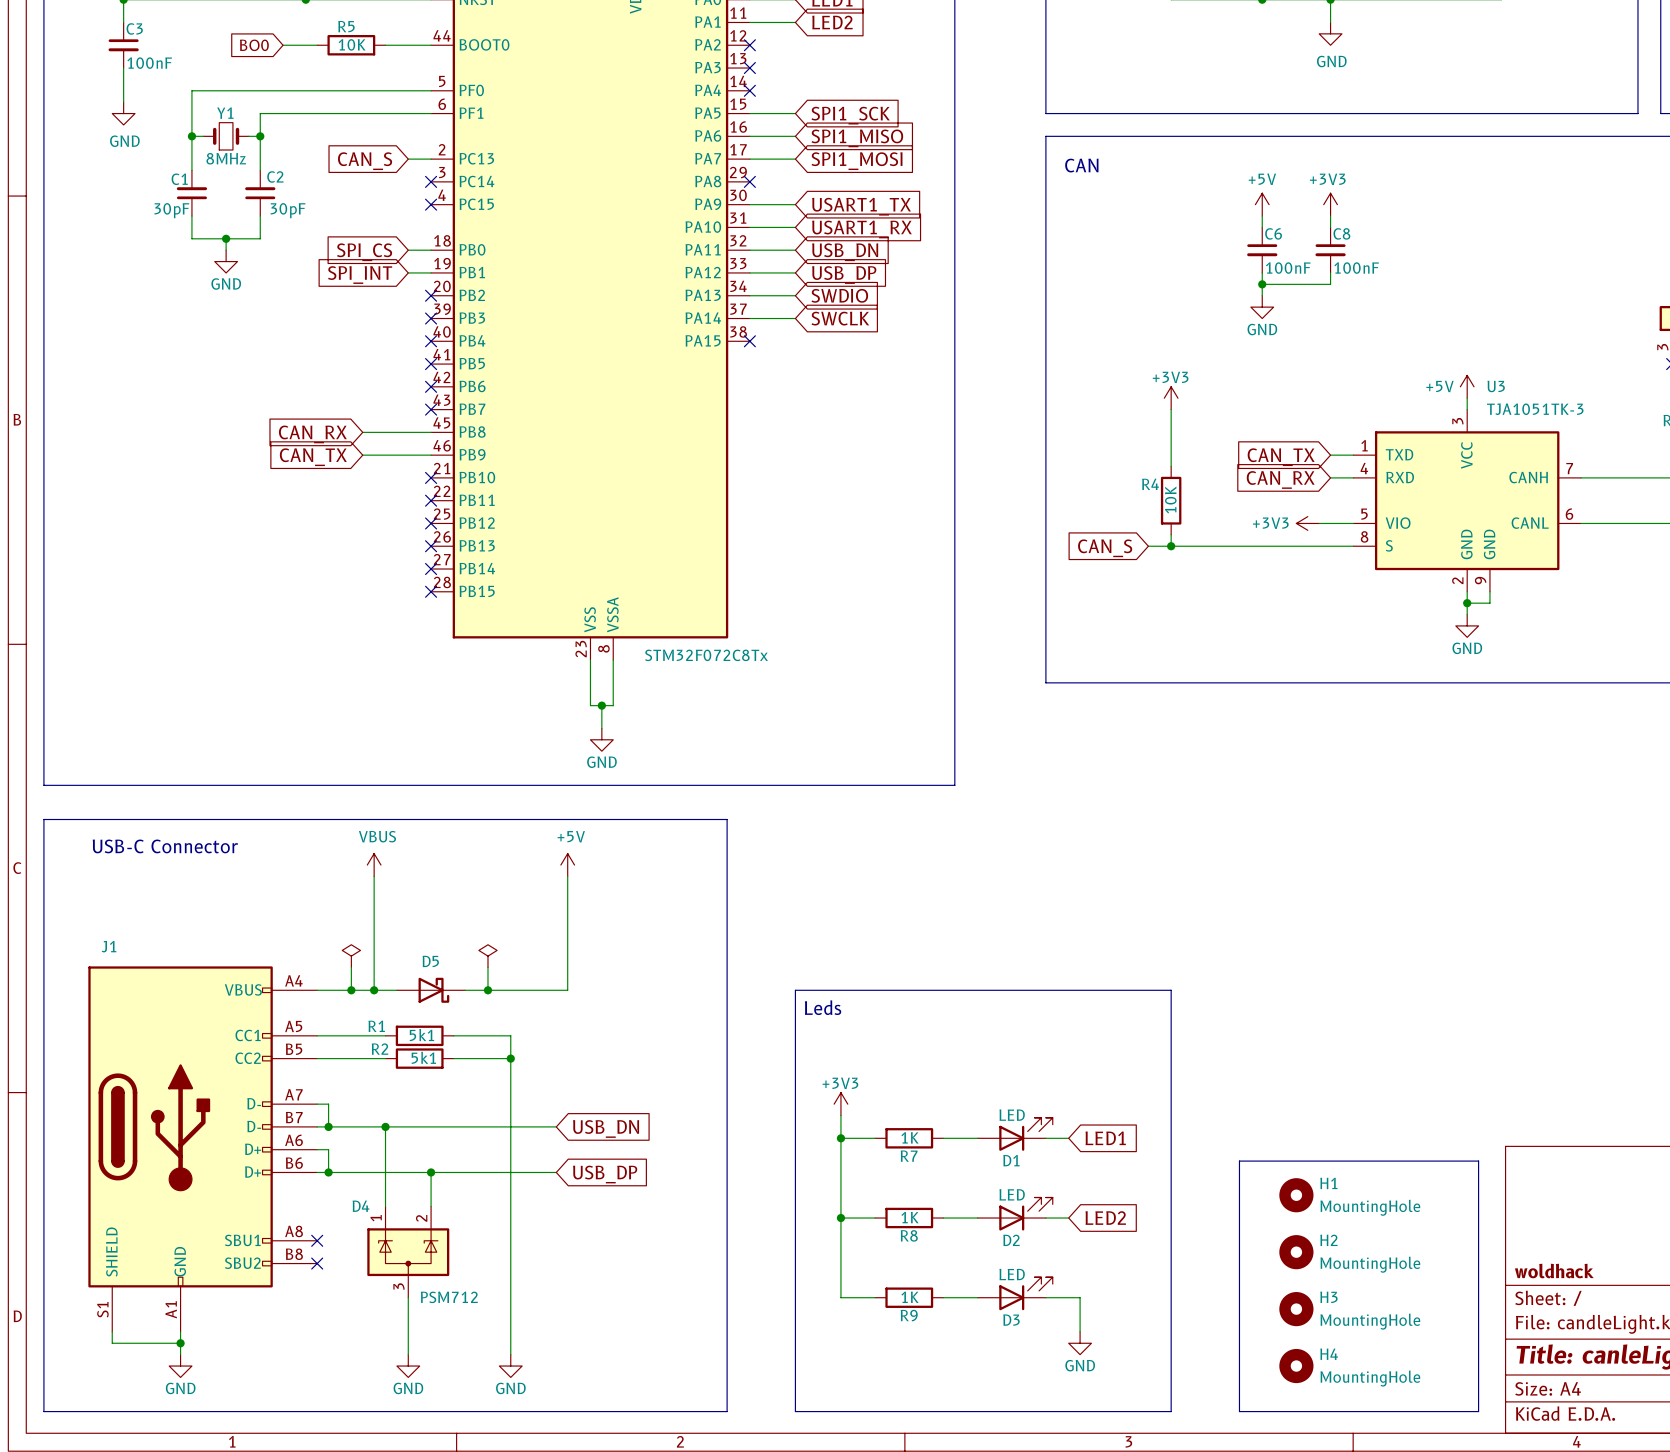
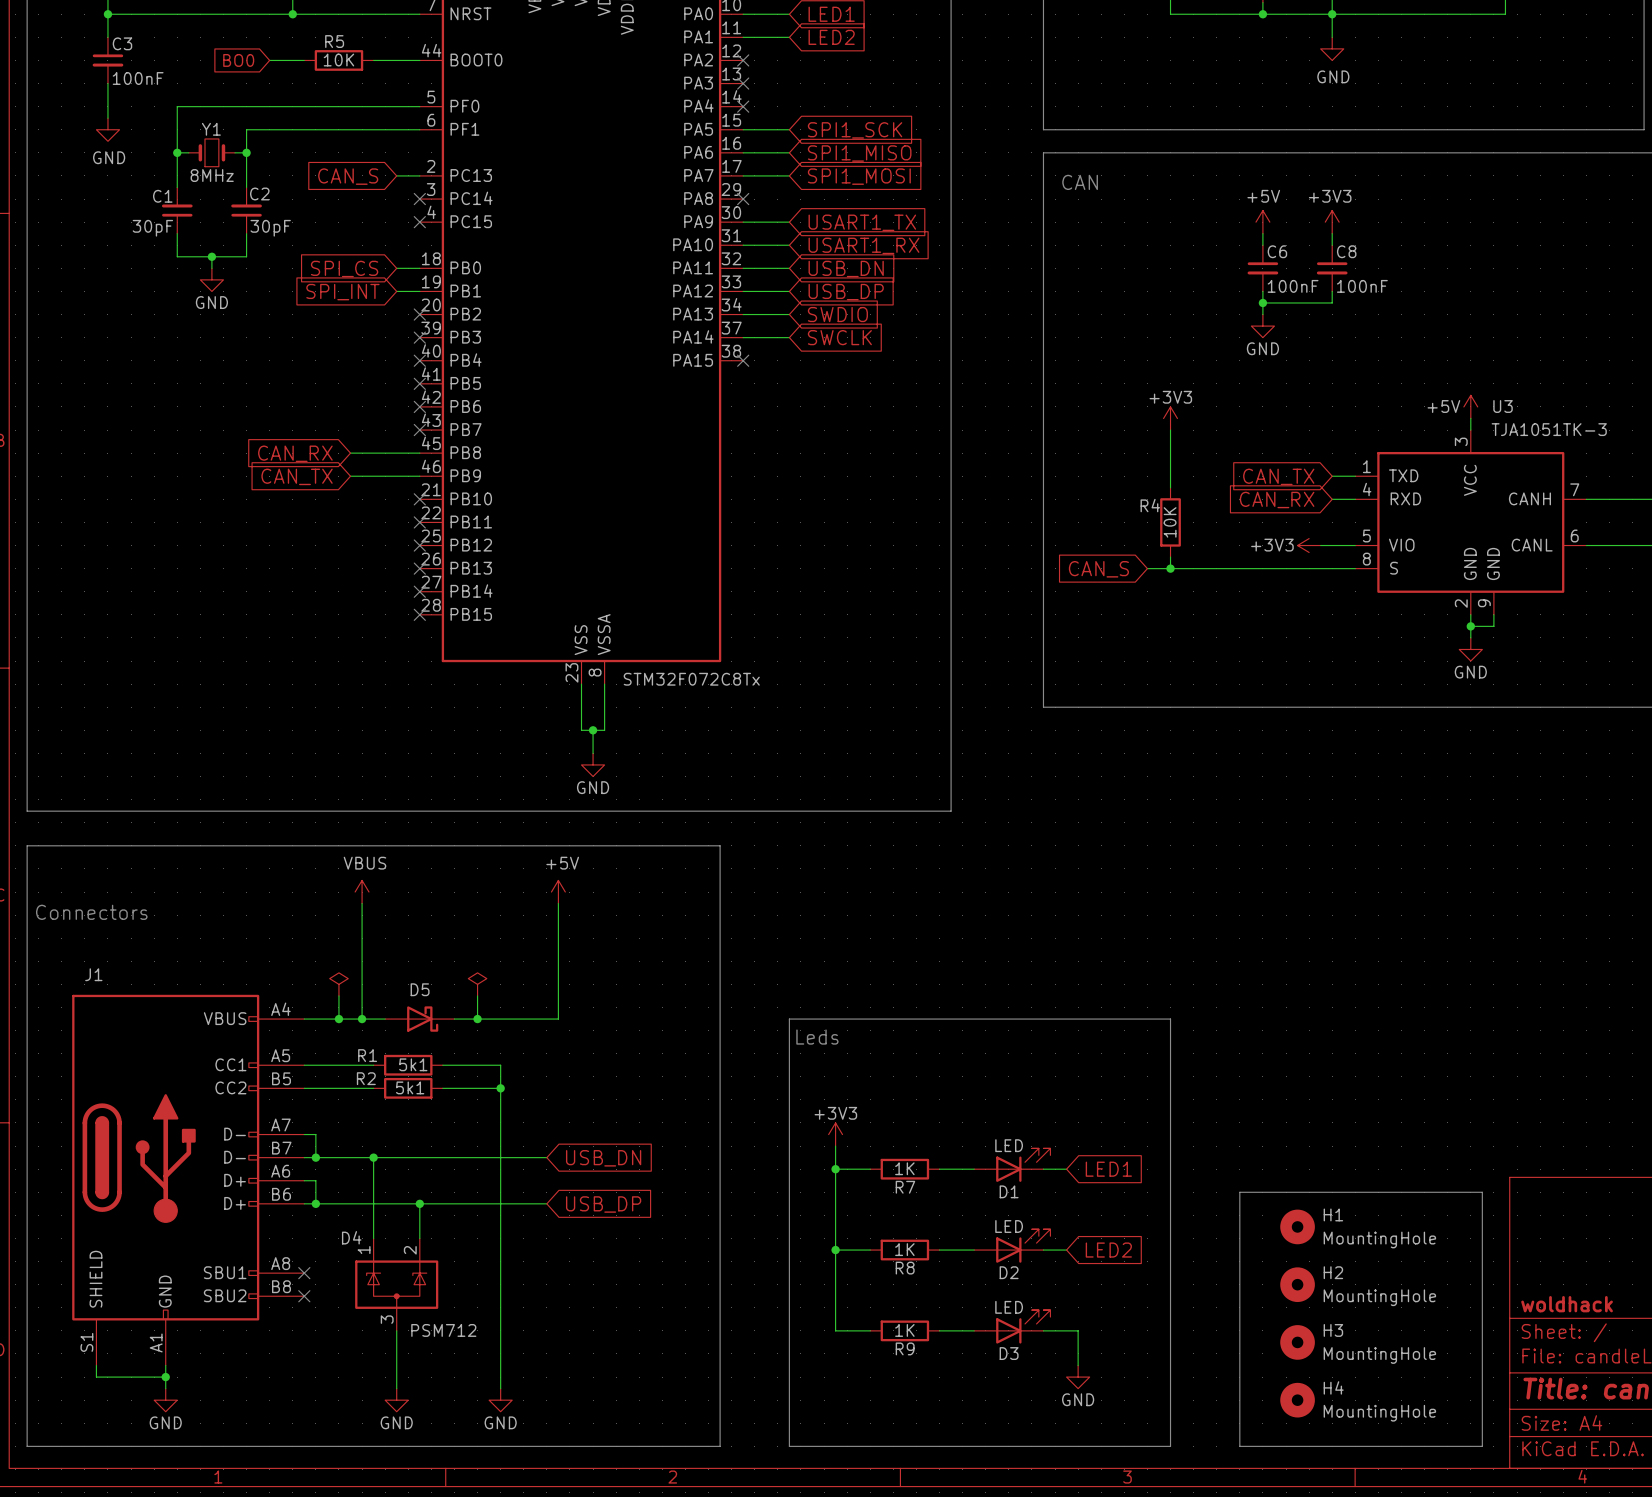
text: USB-C Connector (165, 846) -> none
text: none -> Connectors (91, 912)

